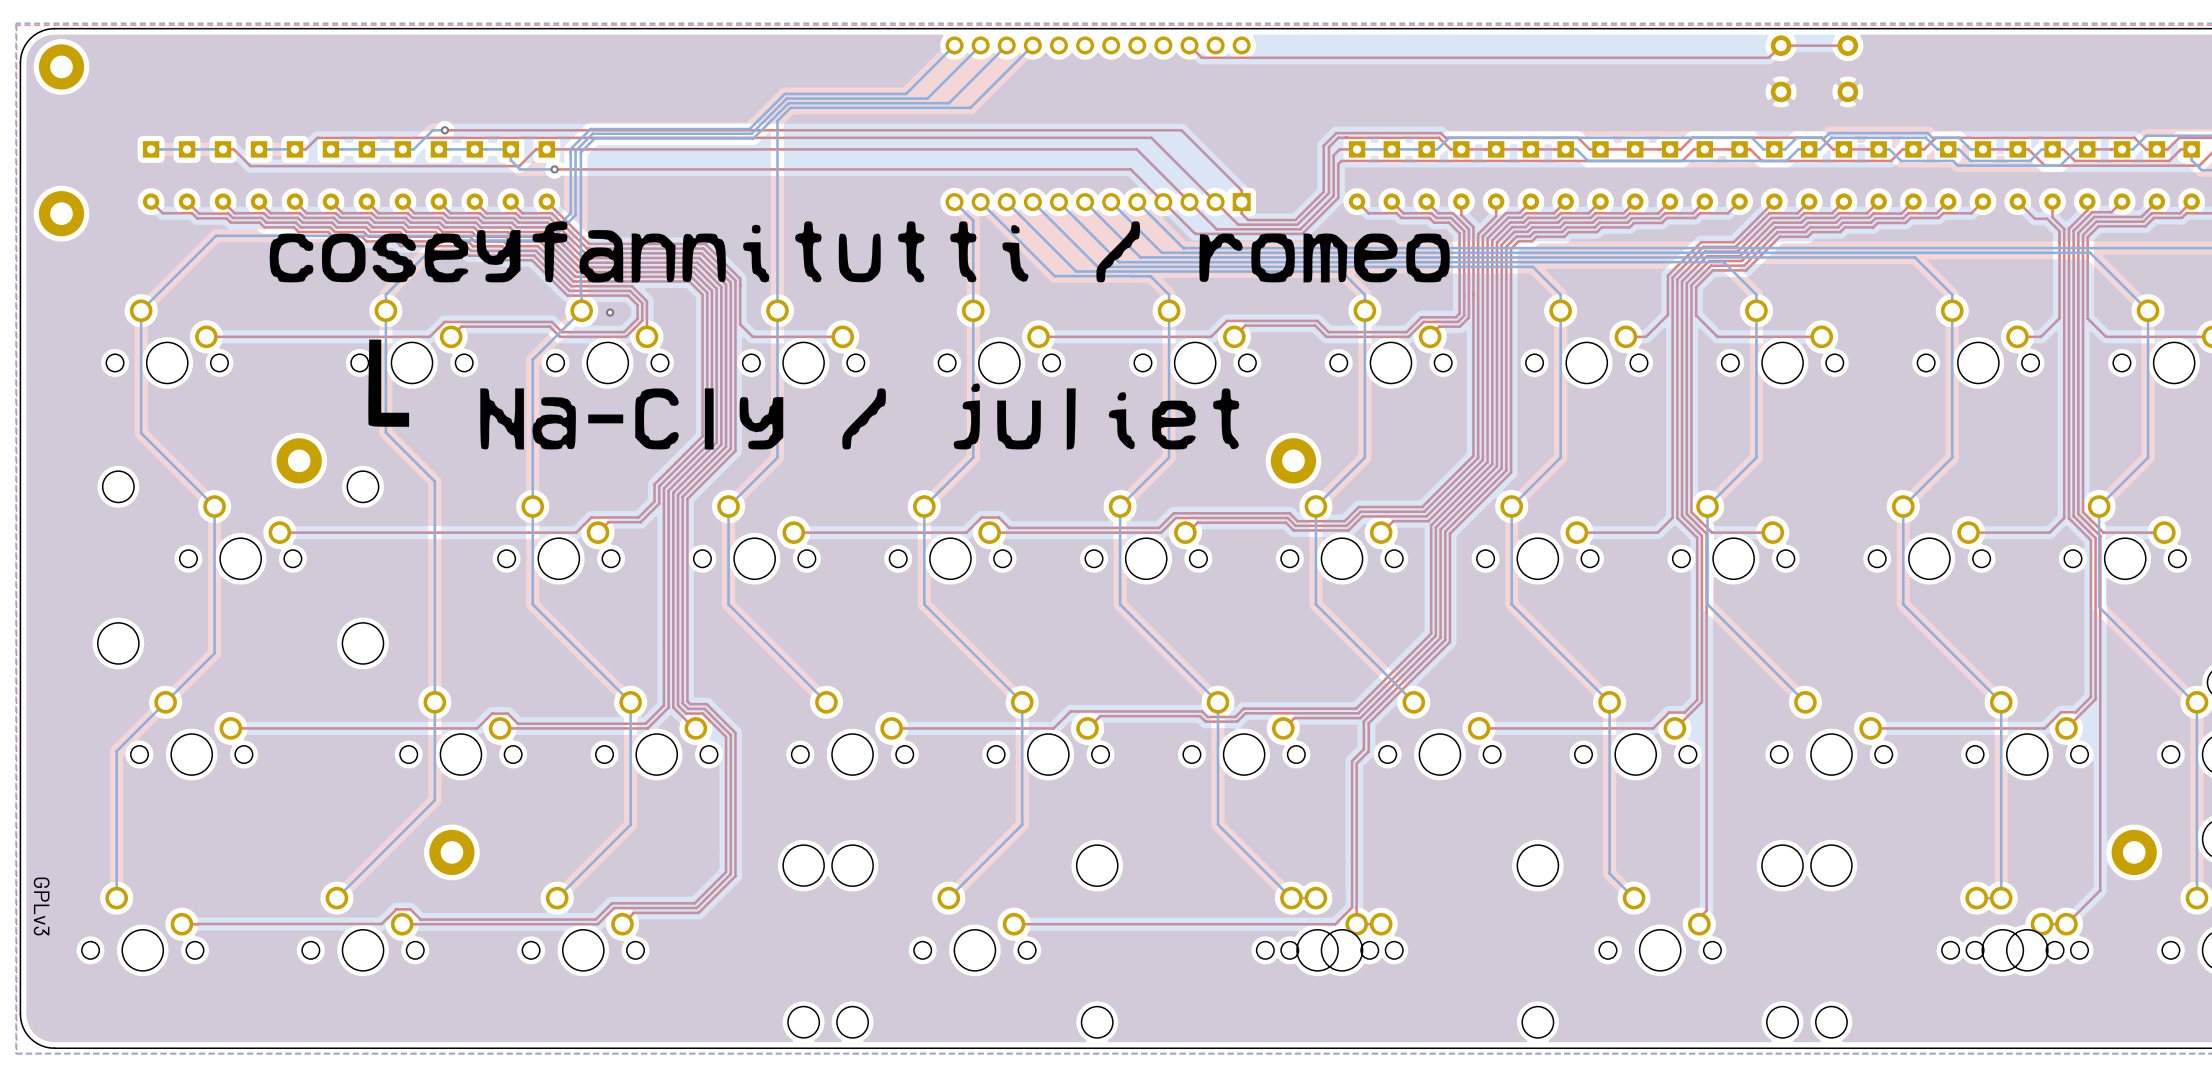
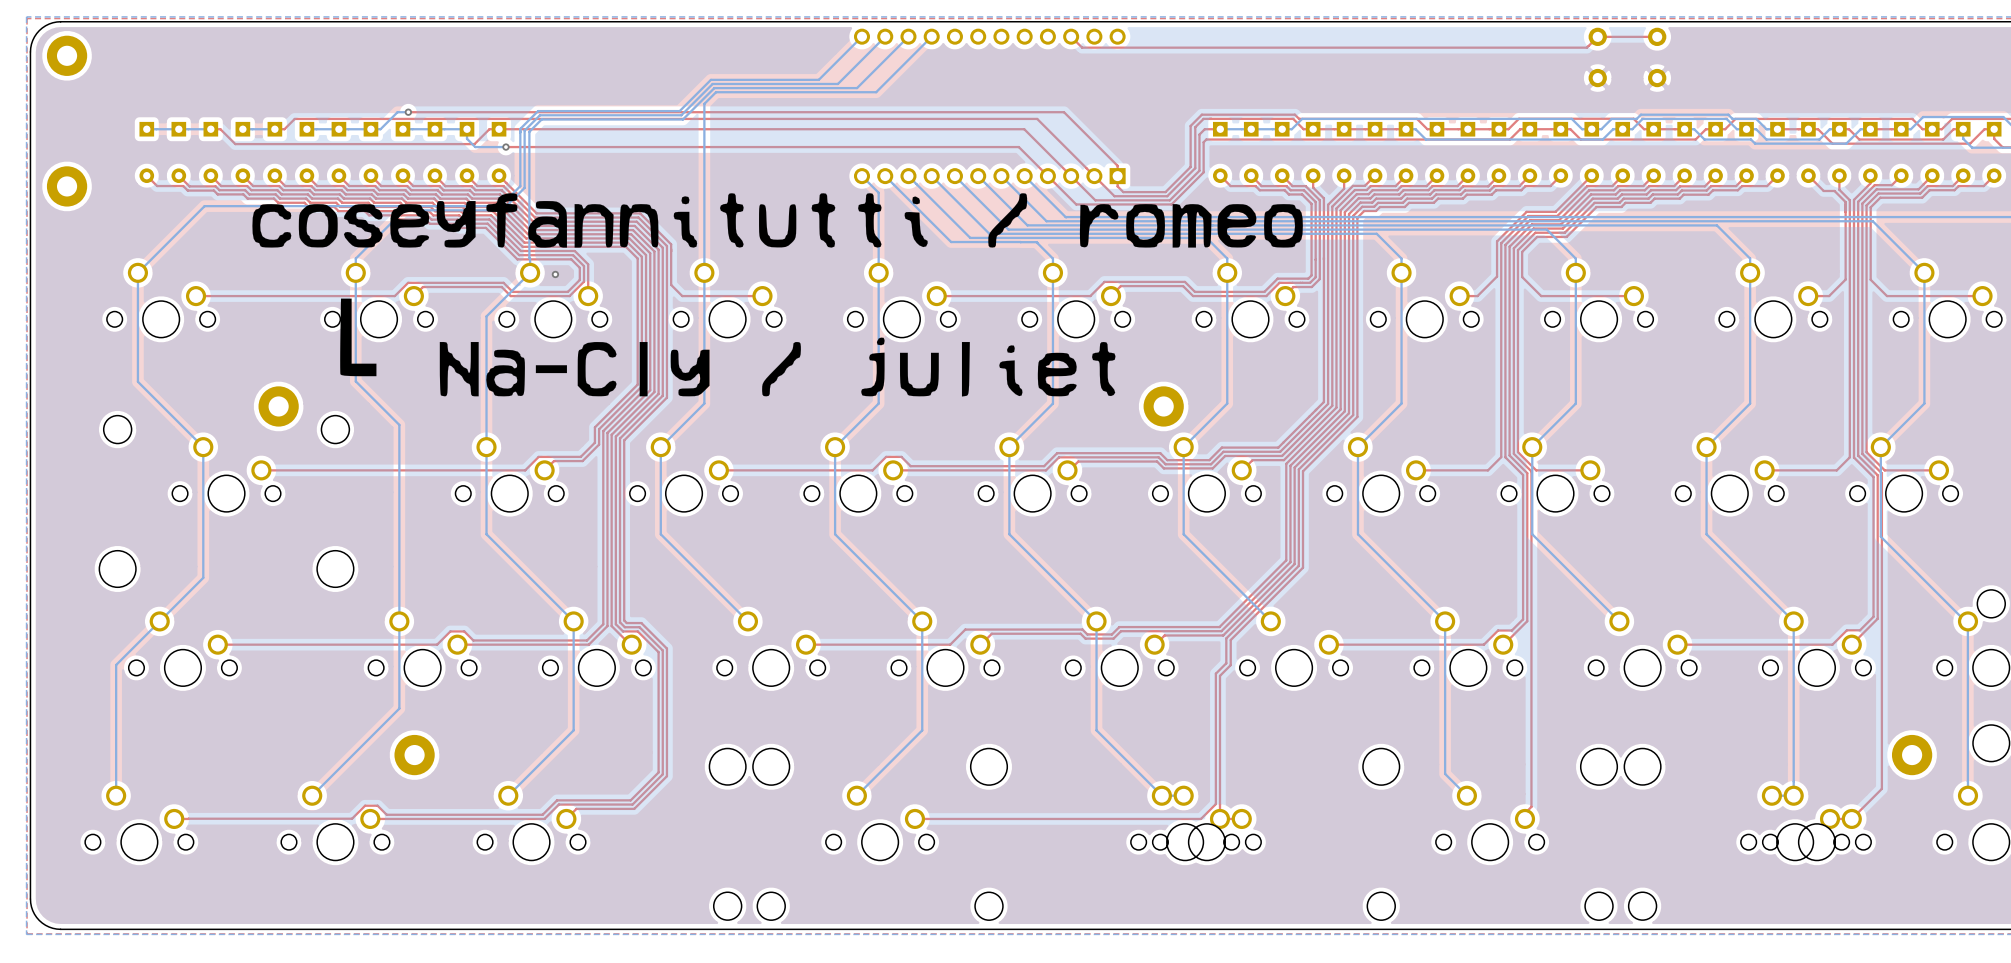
text: GPLv3 (41, 906) -> none

